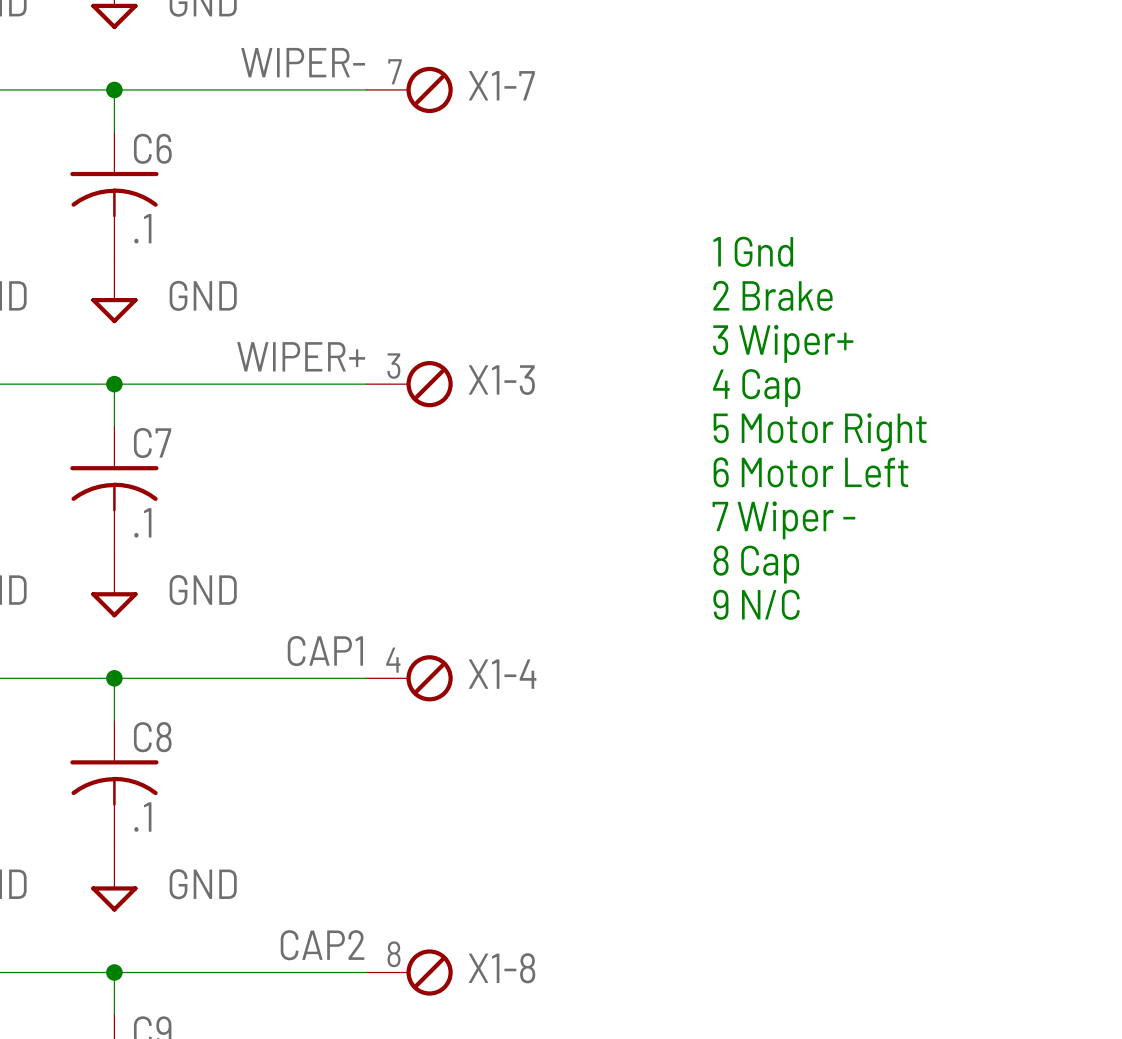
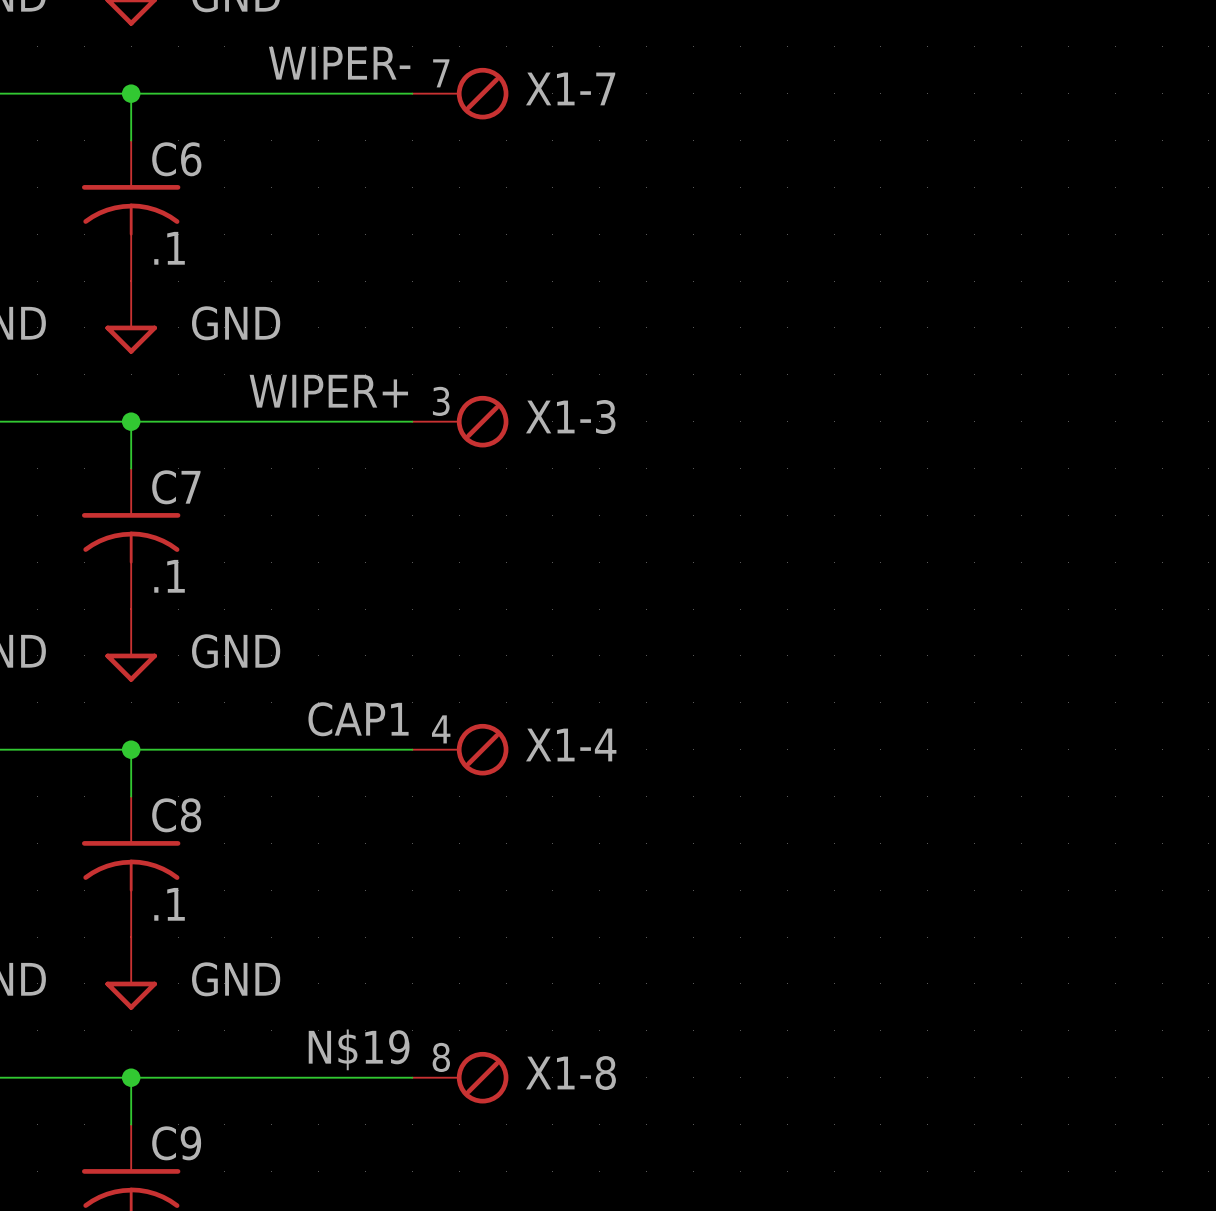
text: 1 Gnd (753, 251) -> none
text: 2 Brake (772, 295) -> none
text: 3 Wiper+ (783, 343) -> none
text: 4 Cap (756, 388) -> none
text: 5 Motor Right (820, 432) -> none
text: 6 Motor Left (810, 472) -> none
text: 7 Wiper - (783, 520) -> none
text: 8 Cap (756, 564) -> none
text: 9 N/C (756, 604) -> none
label: CAP2 (322, 945) -> N$19 (359, 1049)

